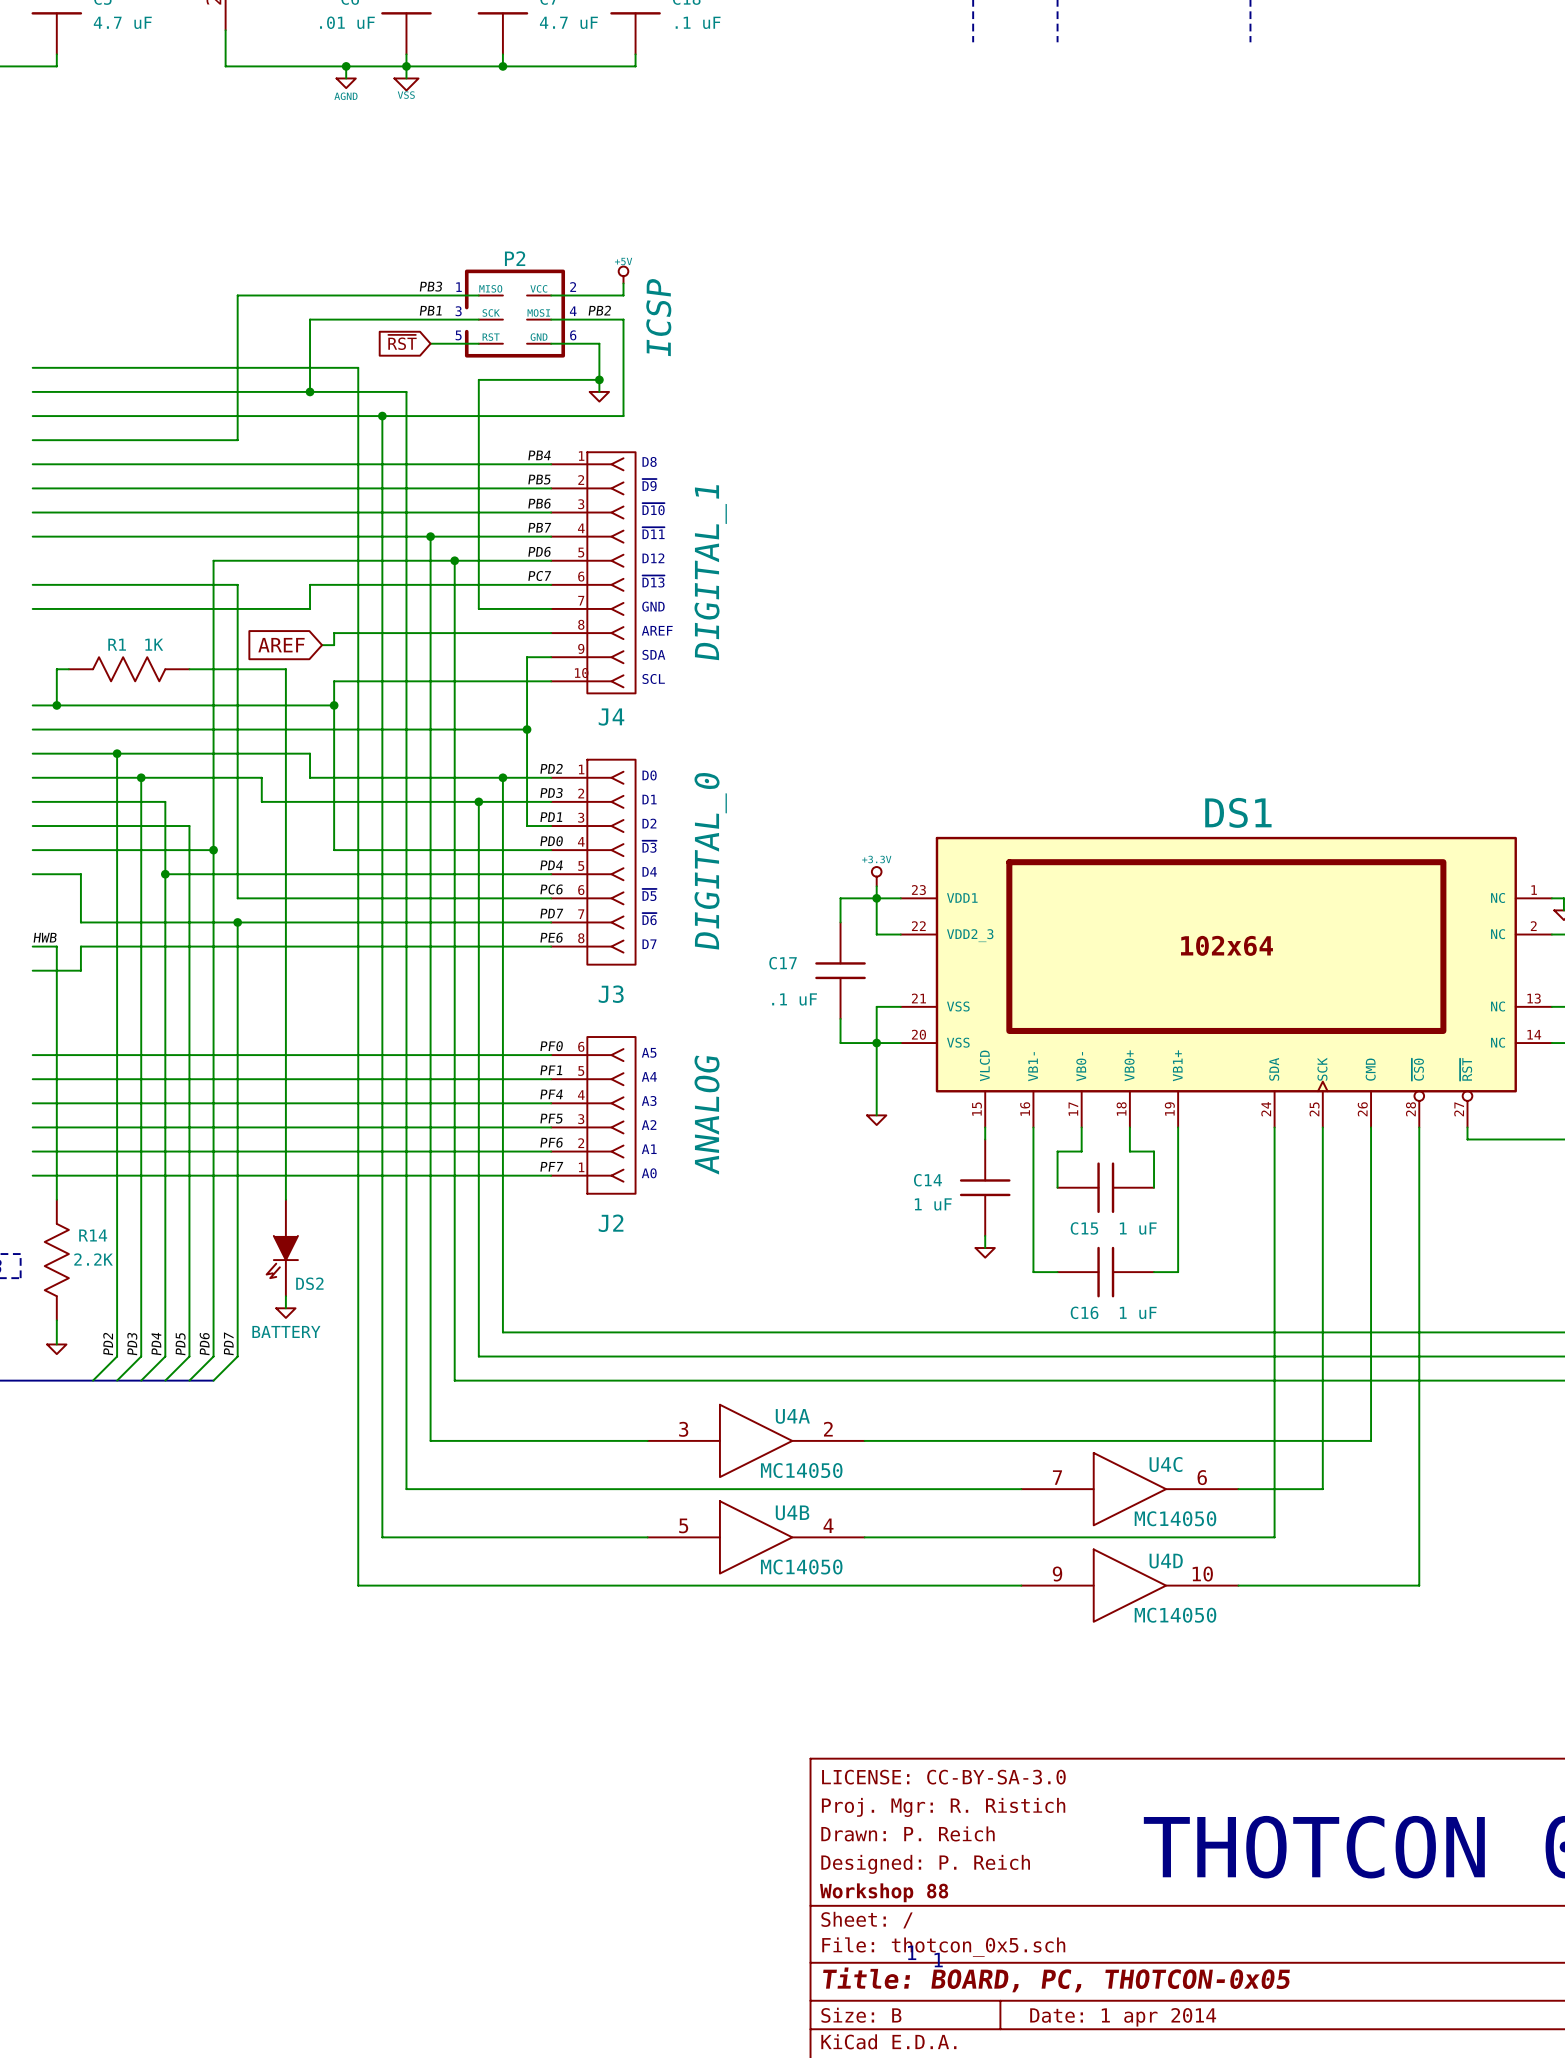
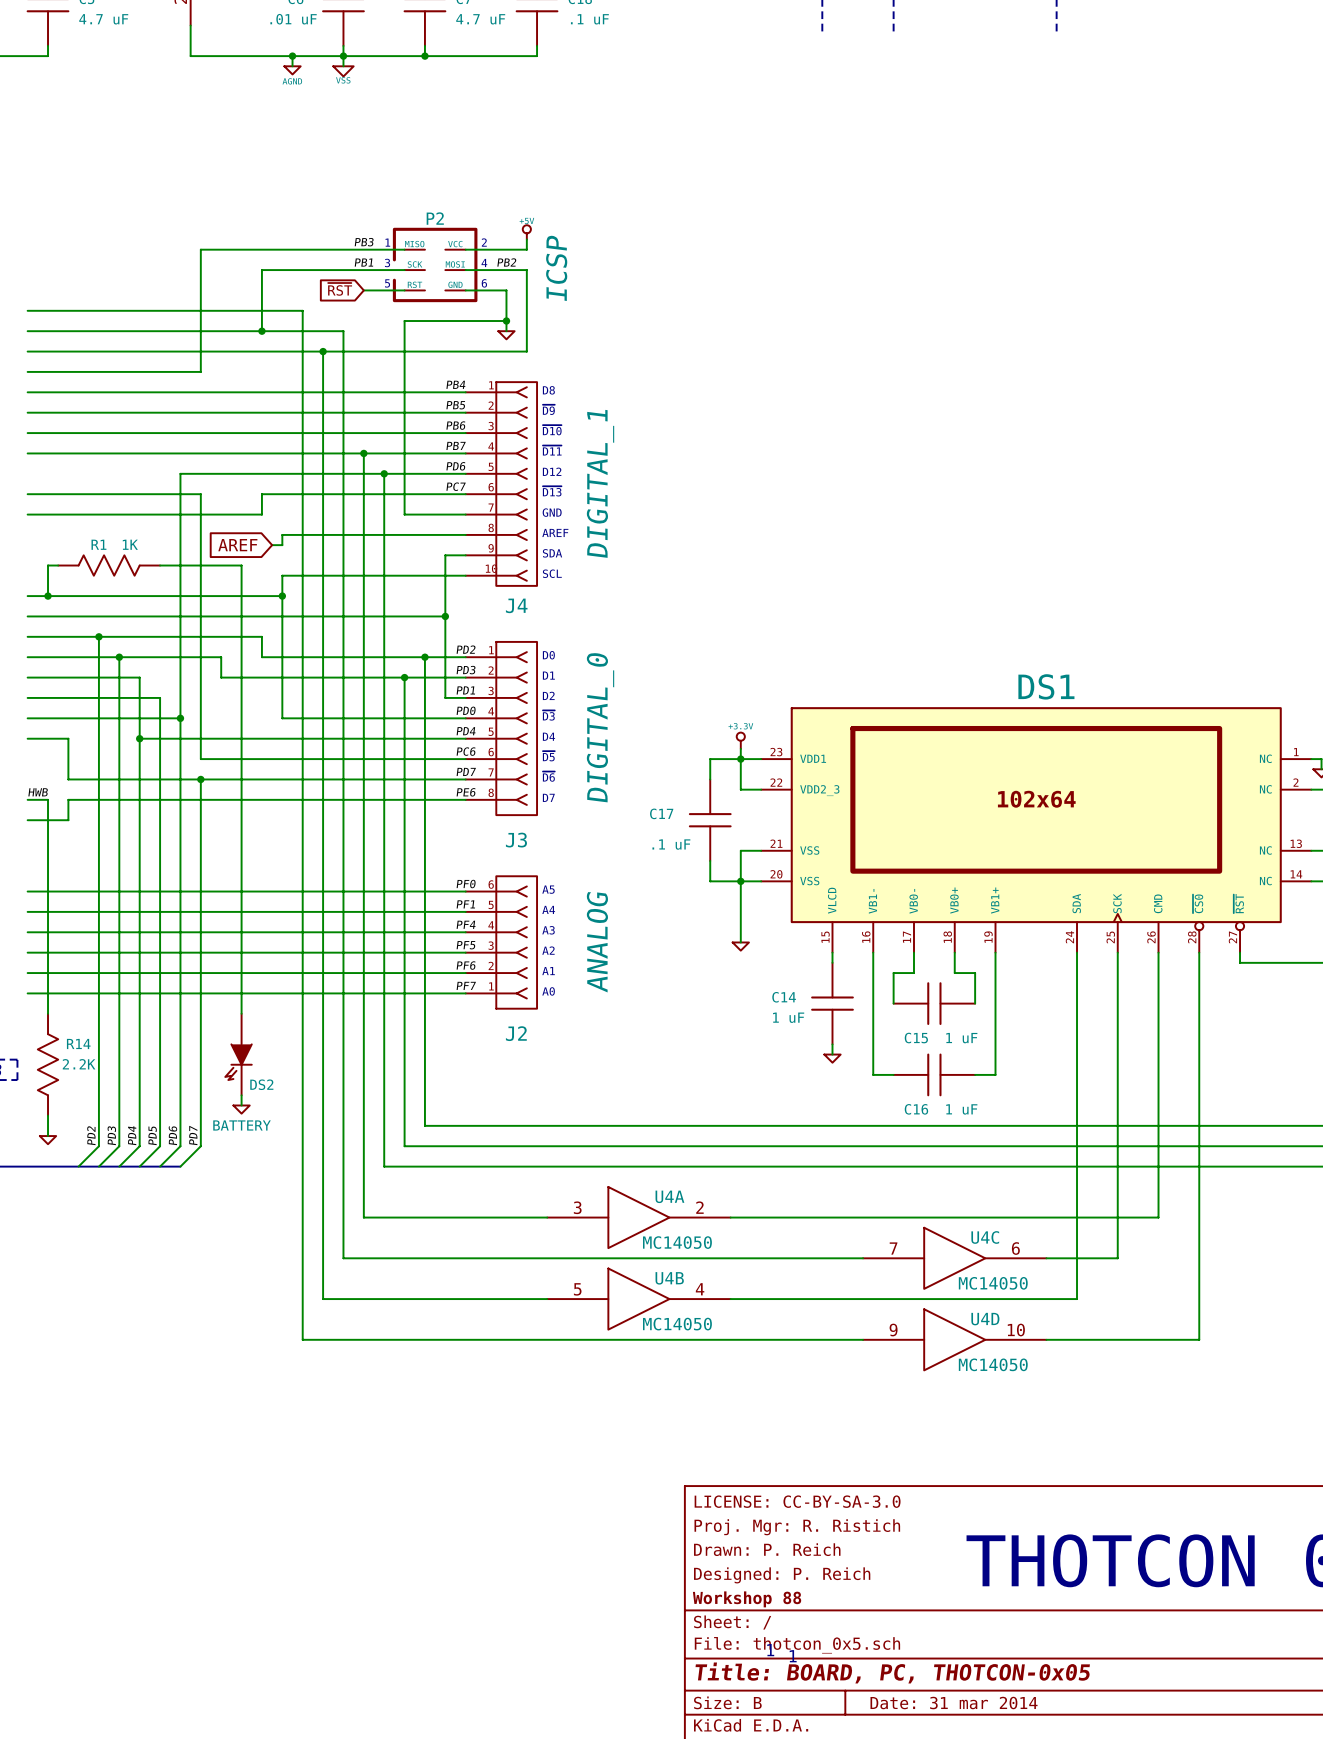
title block: Date: 1 apr 2014 (1123, 2017) -> Date: 31 mar 2014 (954, 1703)

